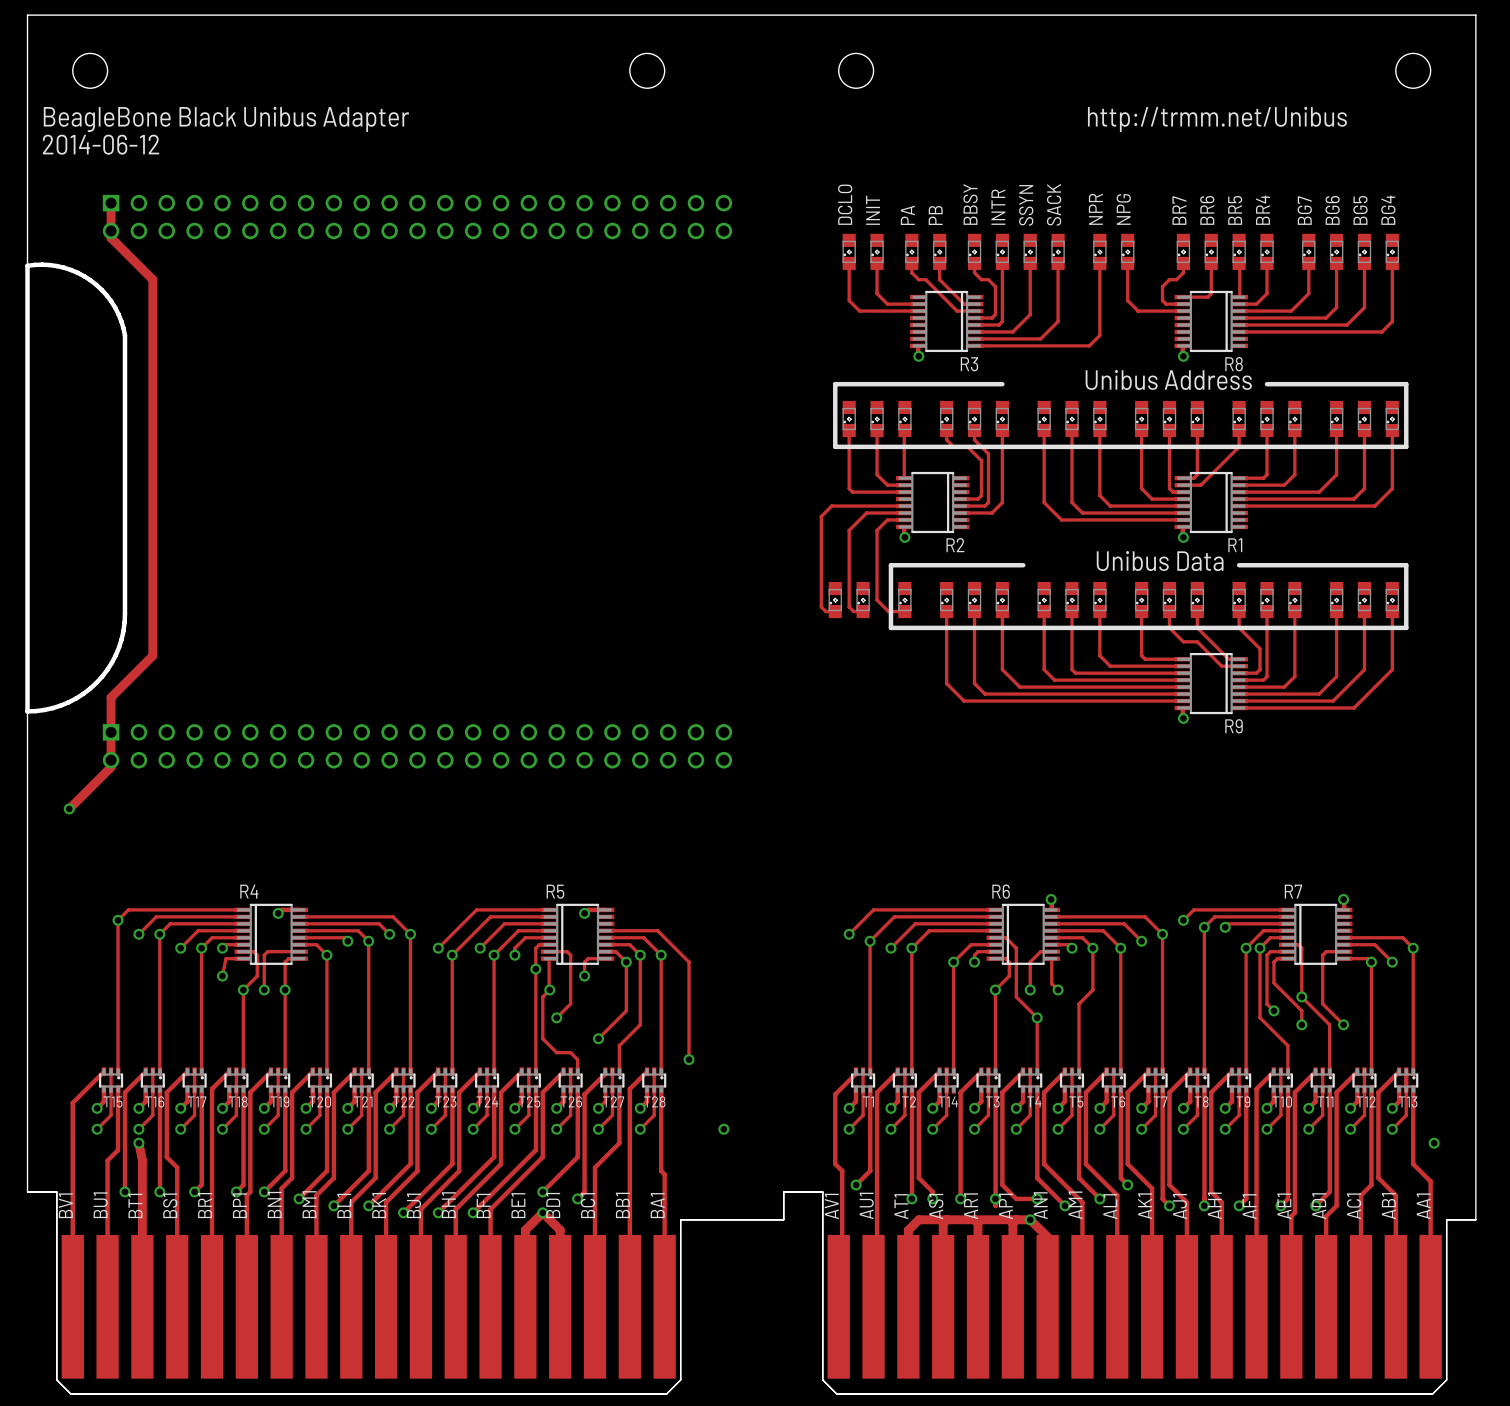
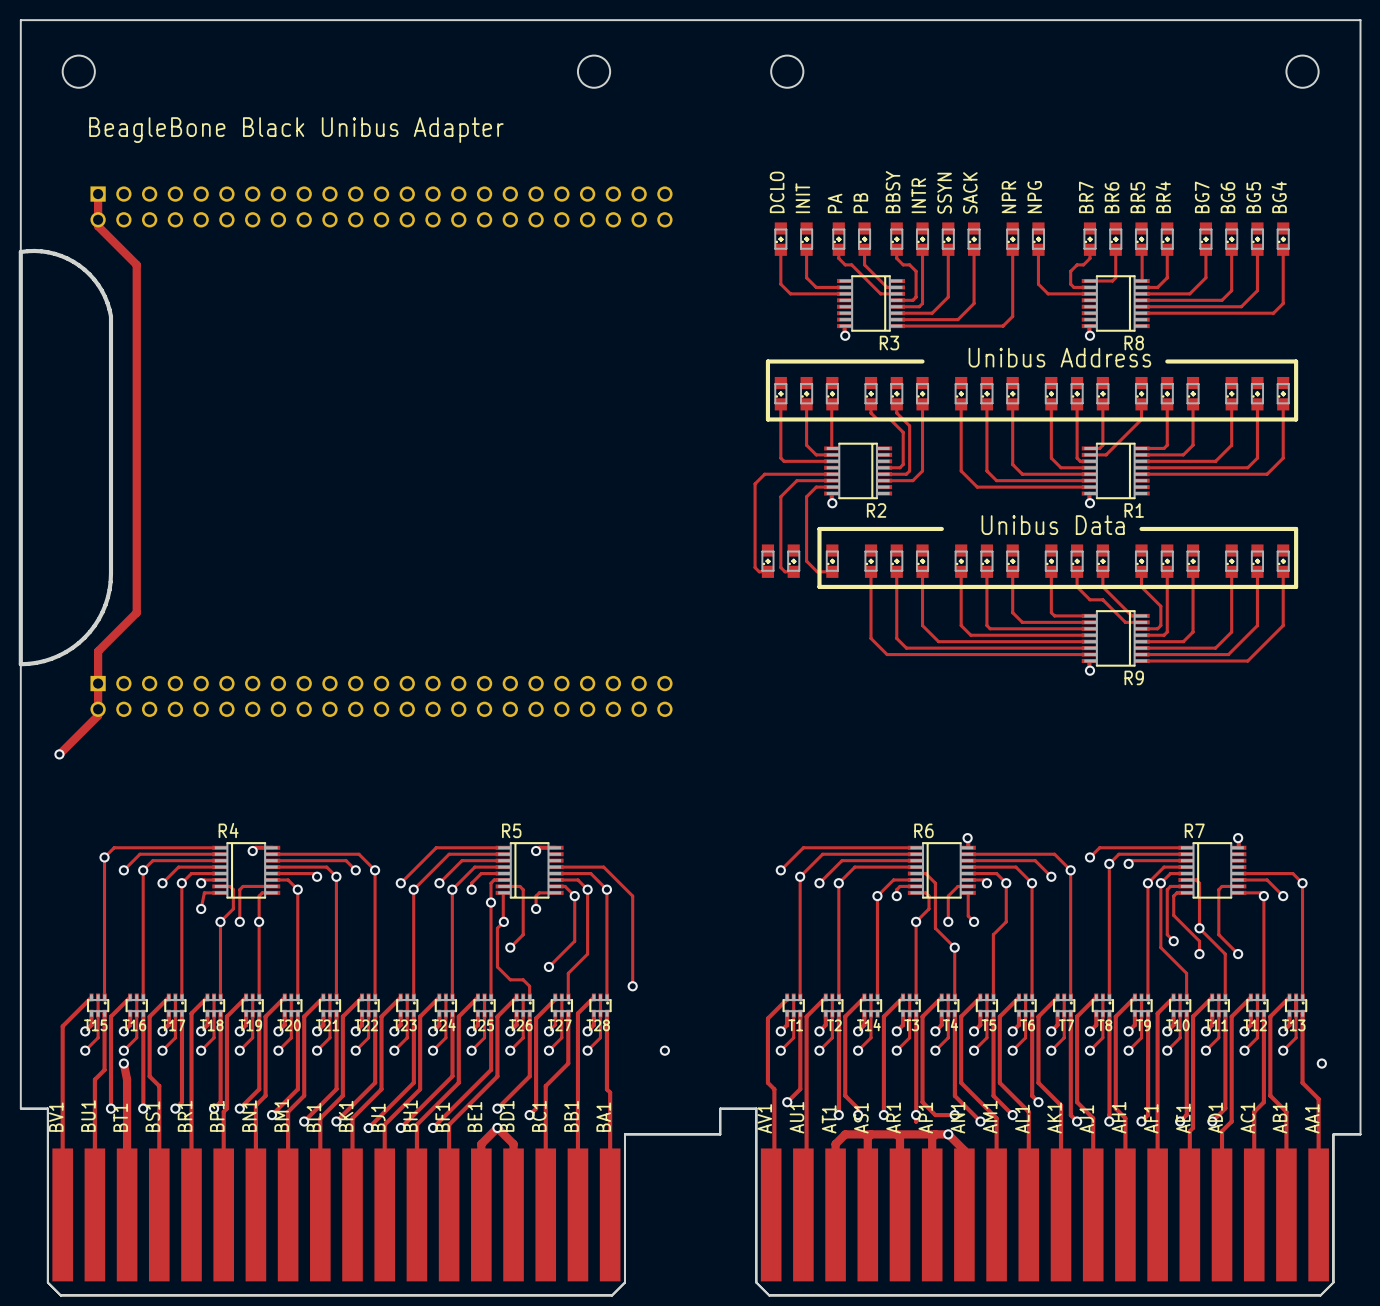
text position: BeagleBone Black Unibus Adapter (226, 119) -> BeagleBone Black Unibus Adapter (296, 130)
text: http://trmm.net/Unibus (1217, 119) -> none
text: 2014-06-12 (101, 144) -> none

